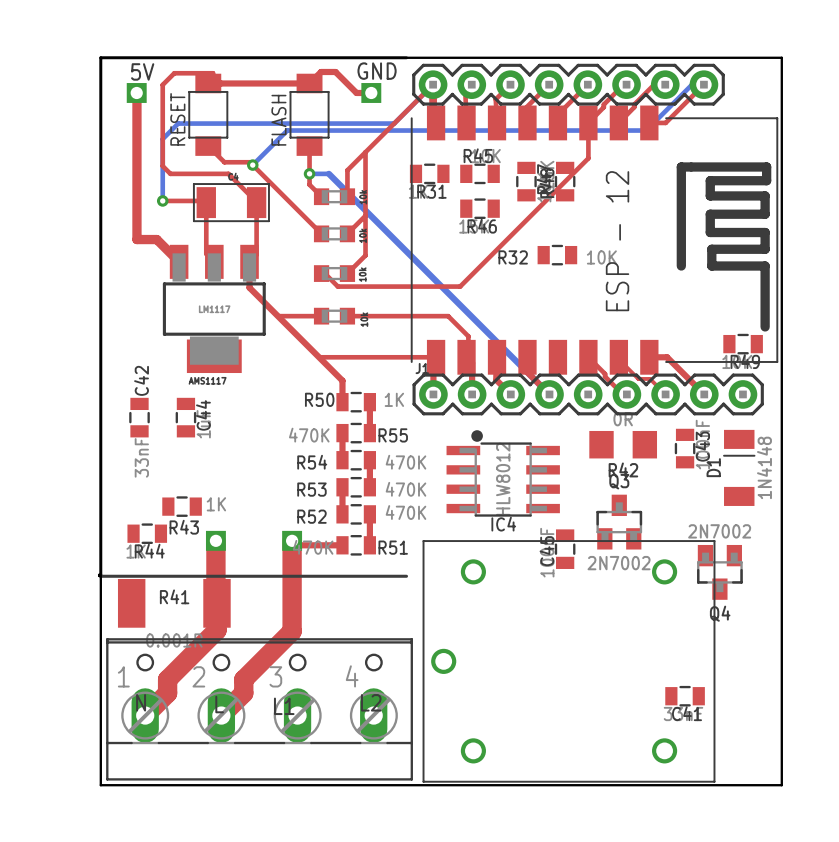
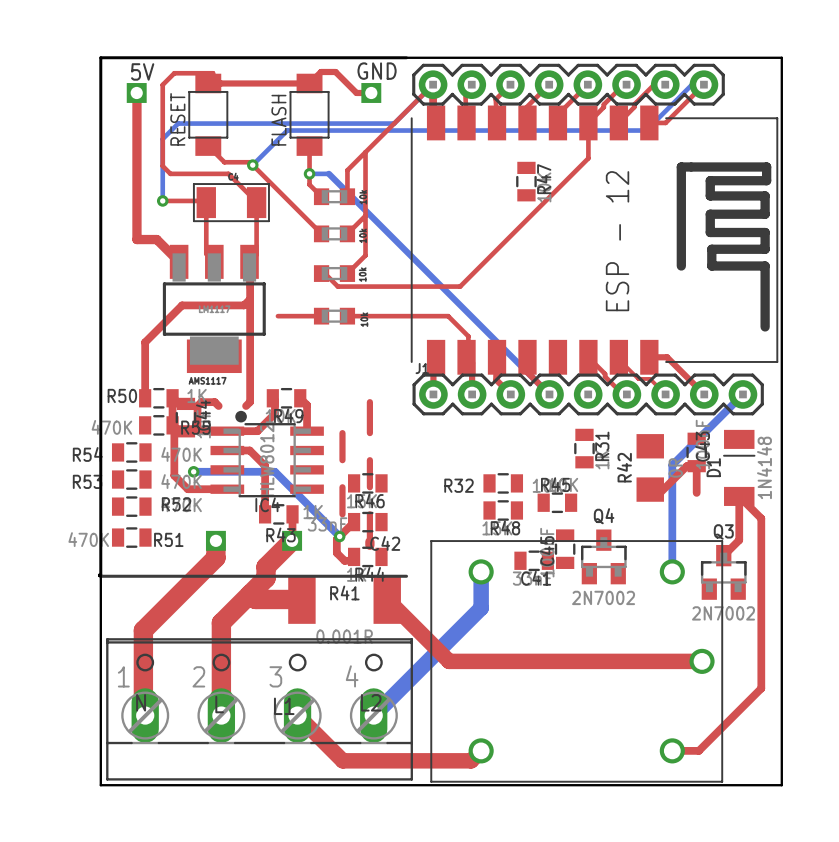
R31 rotation: 0° (429, 173) -> 90° clockwise (584, 448)
R31 position: (429, 173) -> (584, 448)
R45 position: (480, 173) -> (557, 502)
R48 rotation: 0° (565, 181) -> 90° clockwise (503, 510)
R48 position: (565, 181) -> (503, 510)
R46 position: (480, 208) -> (367, 483)
R32 position: (557, 255) -> (503, 483)
top track: none -> (250, 261) (250, 401) (246, 406)
top track: none -> (250, 299) (243, 305) (182, 305) (145, 342) (145, 398)
R49 position: (743, 344) -> (286, 398)
top track: (436, 357) (319, 357) (249, 287) (342, 380) (342, 402) -> none
bottom track: none -> (742, 394) (672, 465) (672, 571)
top track: none -> (172, 398) (174, 475) (187, 489) (227, 489)
top track: none -> (272, 398) (274, 400) (274, 413) (257, 431) (199, 431) (197, 429) (197, 406) (201, 402) (214, 402) (218, 406)
top track: none -> (300, 398) (307, 405) (307, 431)
R50 position: (356, 402) -> (158, 398)
C42 rotation: 0° (139, 417) -> 90° clockwise (367, 522)
C42 position: (139, 417) -> (367, 522)
R55 position: (356, 433) -> (158, 425)
R42 rotation: 0° (623, 444) -> 90° clockwise (650, 467)
C43 position: (685, 448) -> (696, 452)
top track: none -> (227, 450) (249, 450) (265, 465) (265, 514)
R54 position: (356, 460) -> (131, 452)
bottom track: none -> (193, 471) (274, 471) (339, 536)
via: none -> (193, 471)
IC4 position: (503, 473) -> (267, 454)
R53 position: (356, 487) -> (131, 479)
top track: none -> (650, 489) (657, 495) (686, 466) (696, 466) (696, 492)
R43 position: (182, 506) -> (278, 514)
R52 position: (356, 514) -> (131, 506)
R52 name position: R52 (311, 516) -> R52 (176, 504)
top track: none -> (354, 522) (336, 539) (336, 553) (344, 560) (350, 560) (354, 556)
Q3 position: (619, 522) -> (723, 572)
R44 position: (147, 533) -> (367, 556)
via: none -> (339, 536)
top track: (342, 545) (296, 545) (292, 540) (292, 631) (243, 679) (243, 693) (221, 715) -> (292, 514) (292, 540) (266, 566) (266, 578) (221, 622) (221, 715)
R51 position: (356, 545) -> (131, 537)
top track: none -> (723, 555) (739, 540) (739, 496) (761, 518) (761, 688) (698, 750) (672, 750)
top track: (215, 557) (216, 630) (167, 679) (167, 693) (145, 715) -> (215, 557) (143, 630) (143, 713) (145, 715)
bottom track: none -> (481, 571) (481, 608) (373, 715)
Q4 rotation: 0° (719, 572) -> 180° (603, 556)
Q4 position: (719, 572) -> (603, 556)
top track: none -> (250, 594) (255, 599) (301, 599)
top track: none -> (387, 599) (449, 661) (702, 661)
R41 position: (174, 603) -> (344, 599)
part rotation: 0° (569, 661) -> 180° (576, 661)
C41 position: (685, 696) -> (534, 560)
top track: none -> (297, 715) (342, 760) (471, 760) (481, 750)

